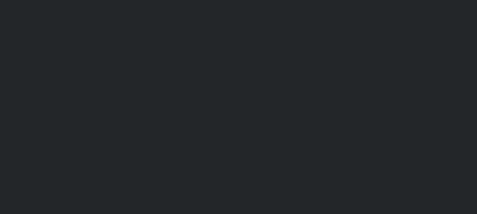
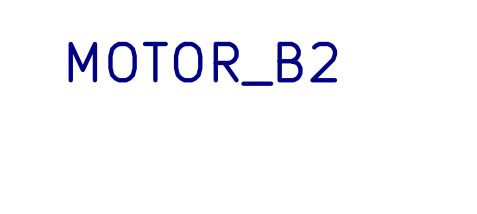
text: none -> MOTOR_B2 (202, 63)

